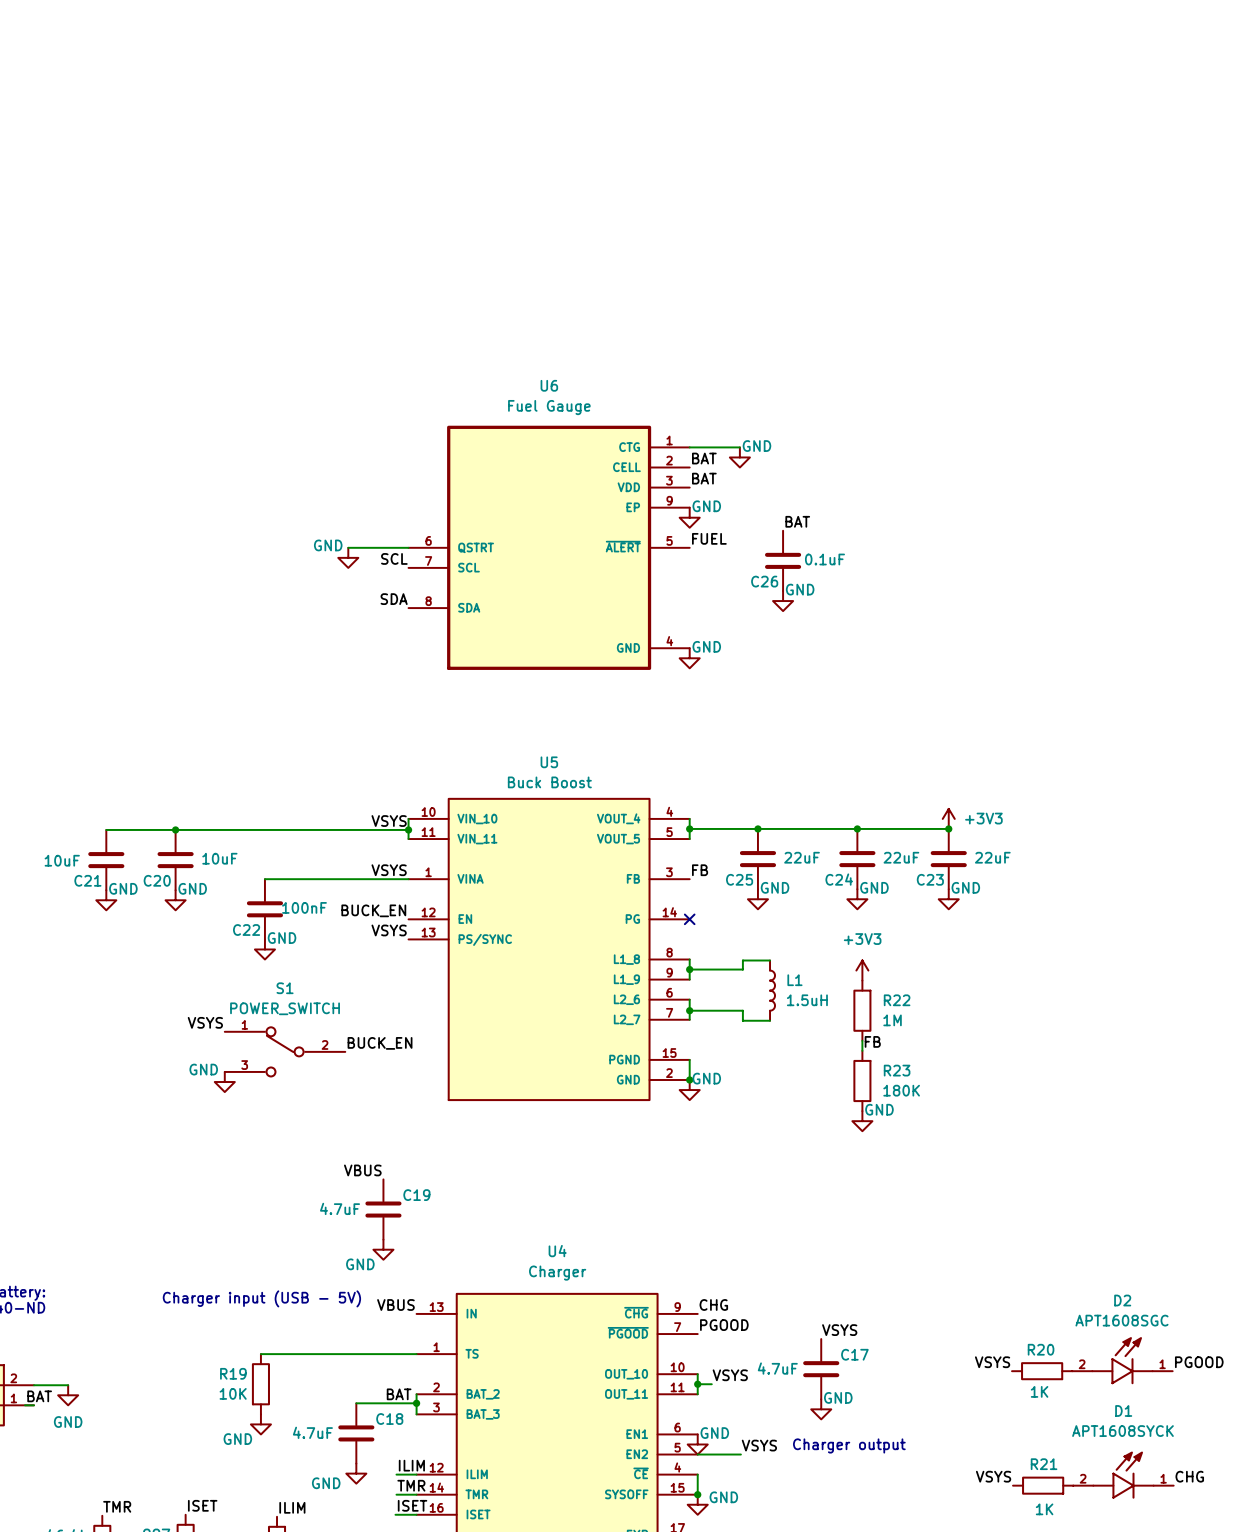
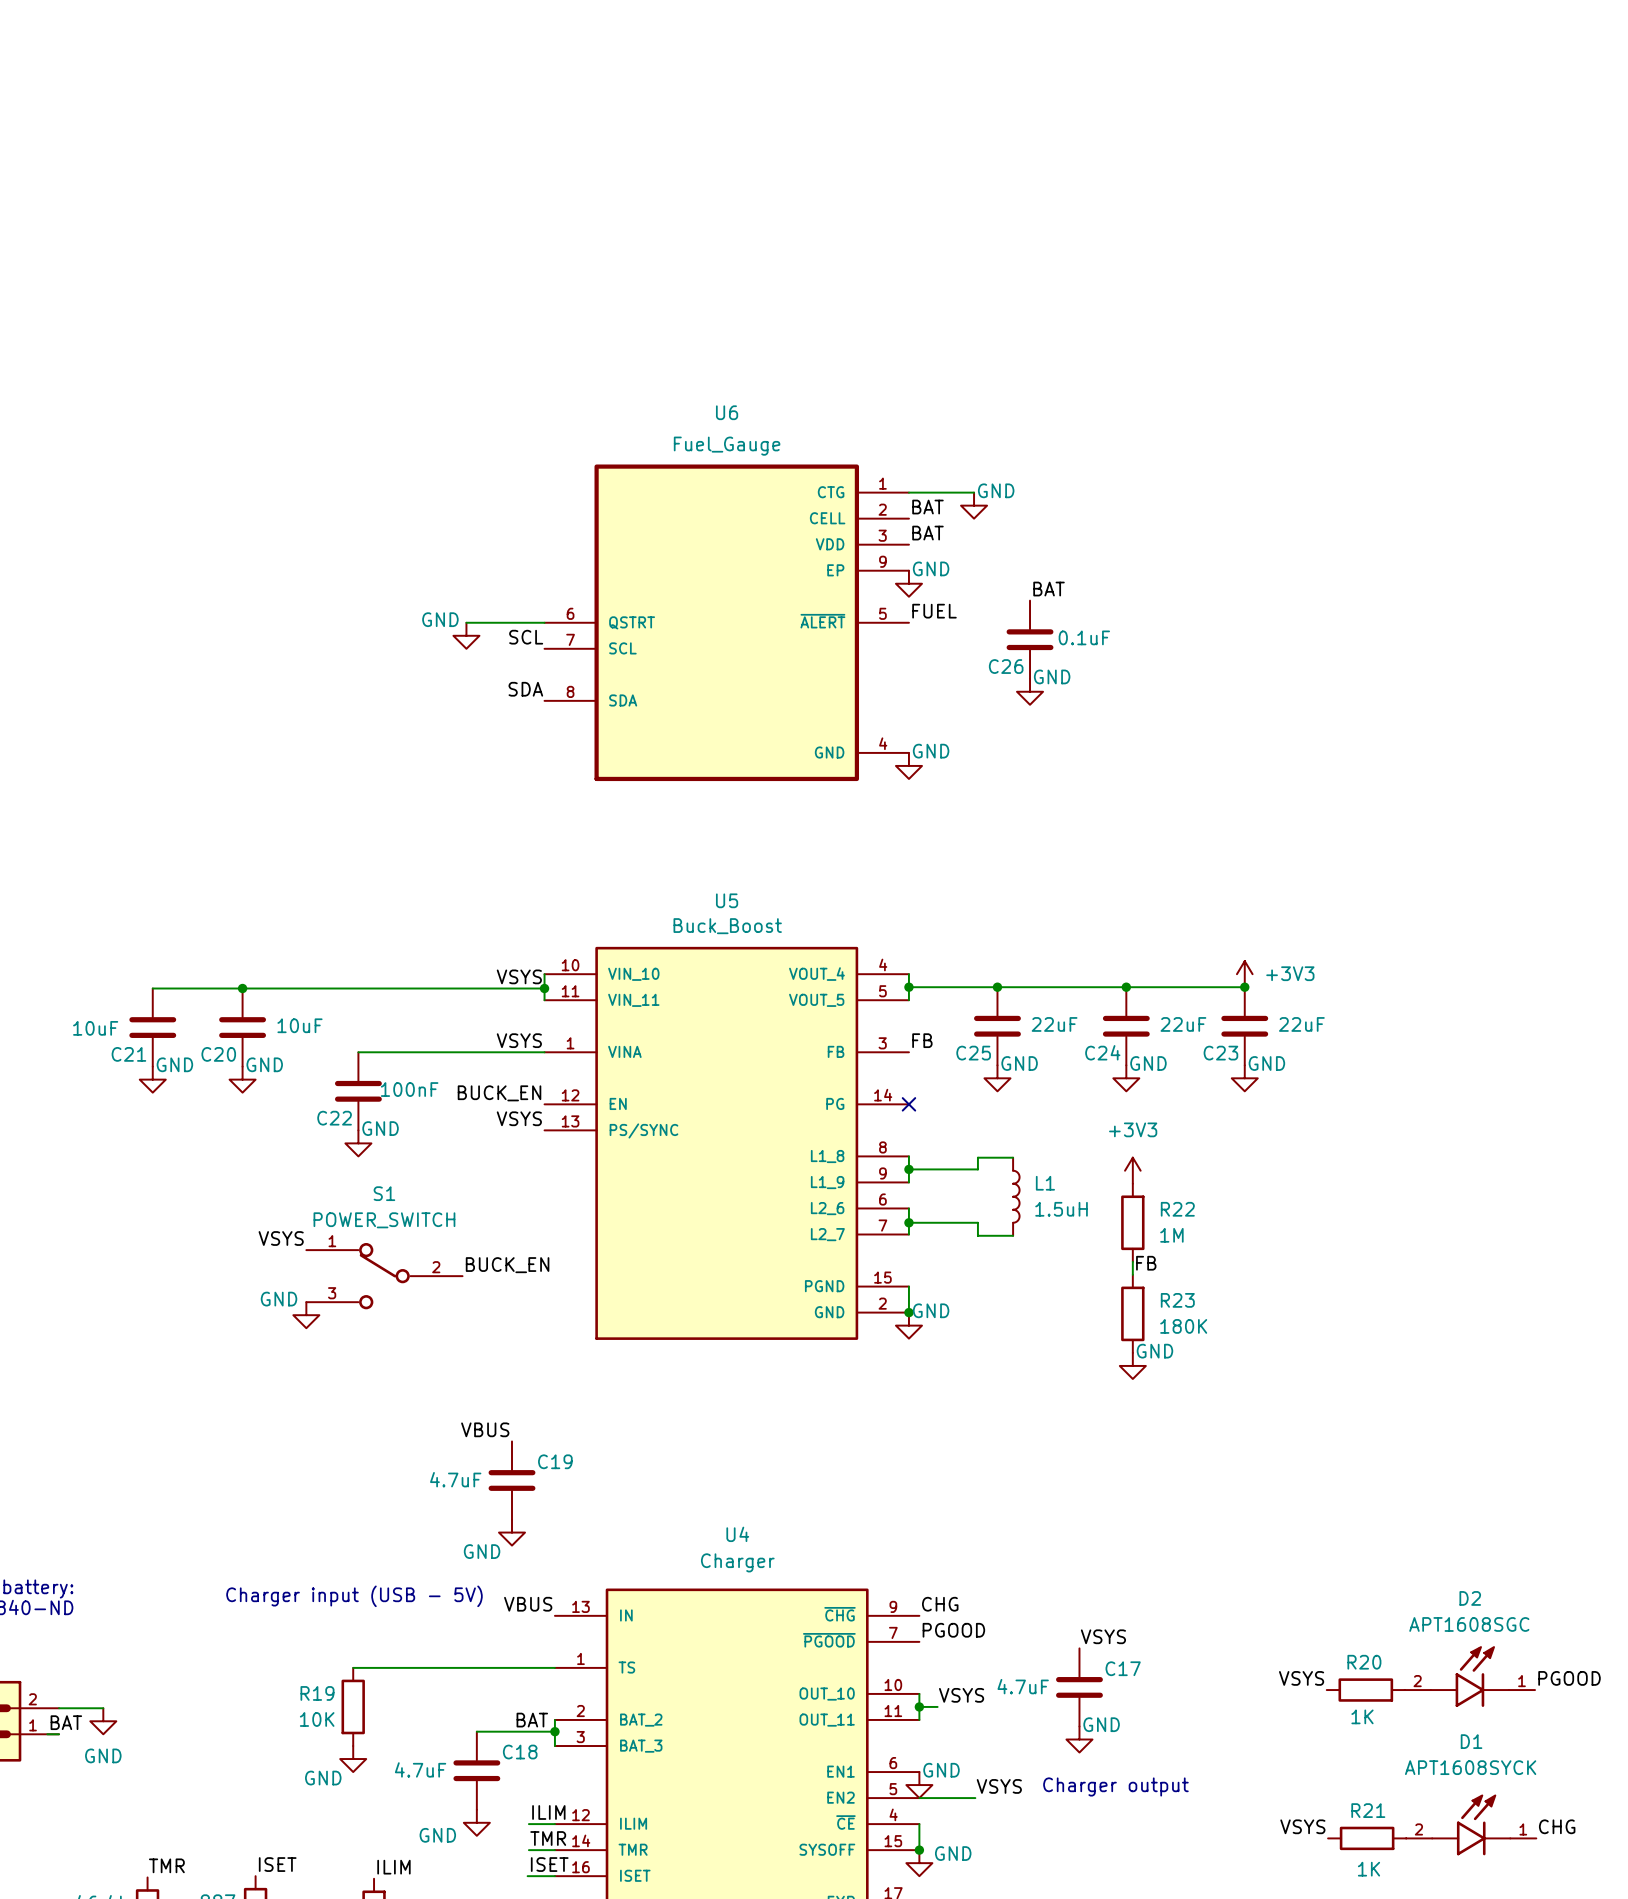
U6 value: Fuel Gauge (549, 407) -> Fuel_Gauge (727, 446)
U5 value: Buck Boost (549, 782) -> Buck_Boost (727, 926)

